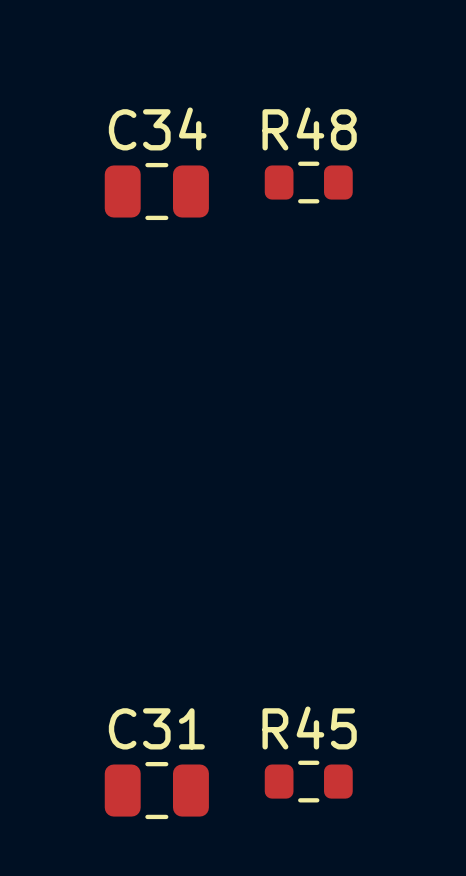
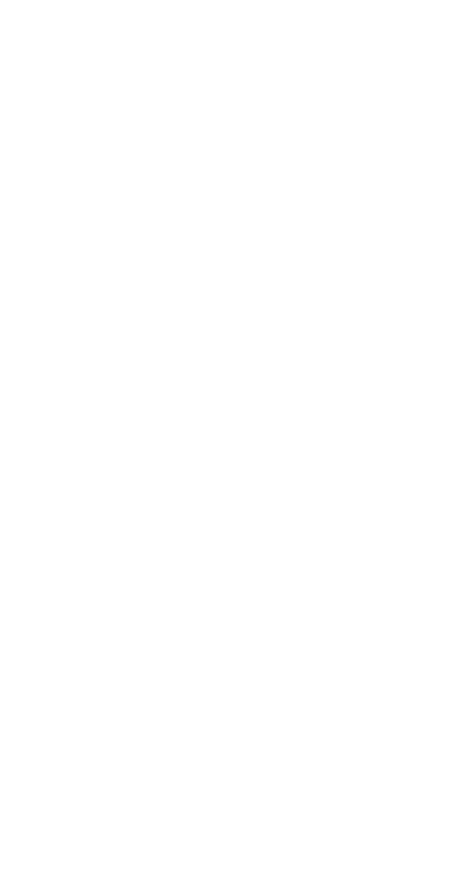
R48: (308, 182) -> none
C34: (156, 191) -> none
R45: (308, 781) -> none
C31: (156, 790) -> none

